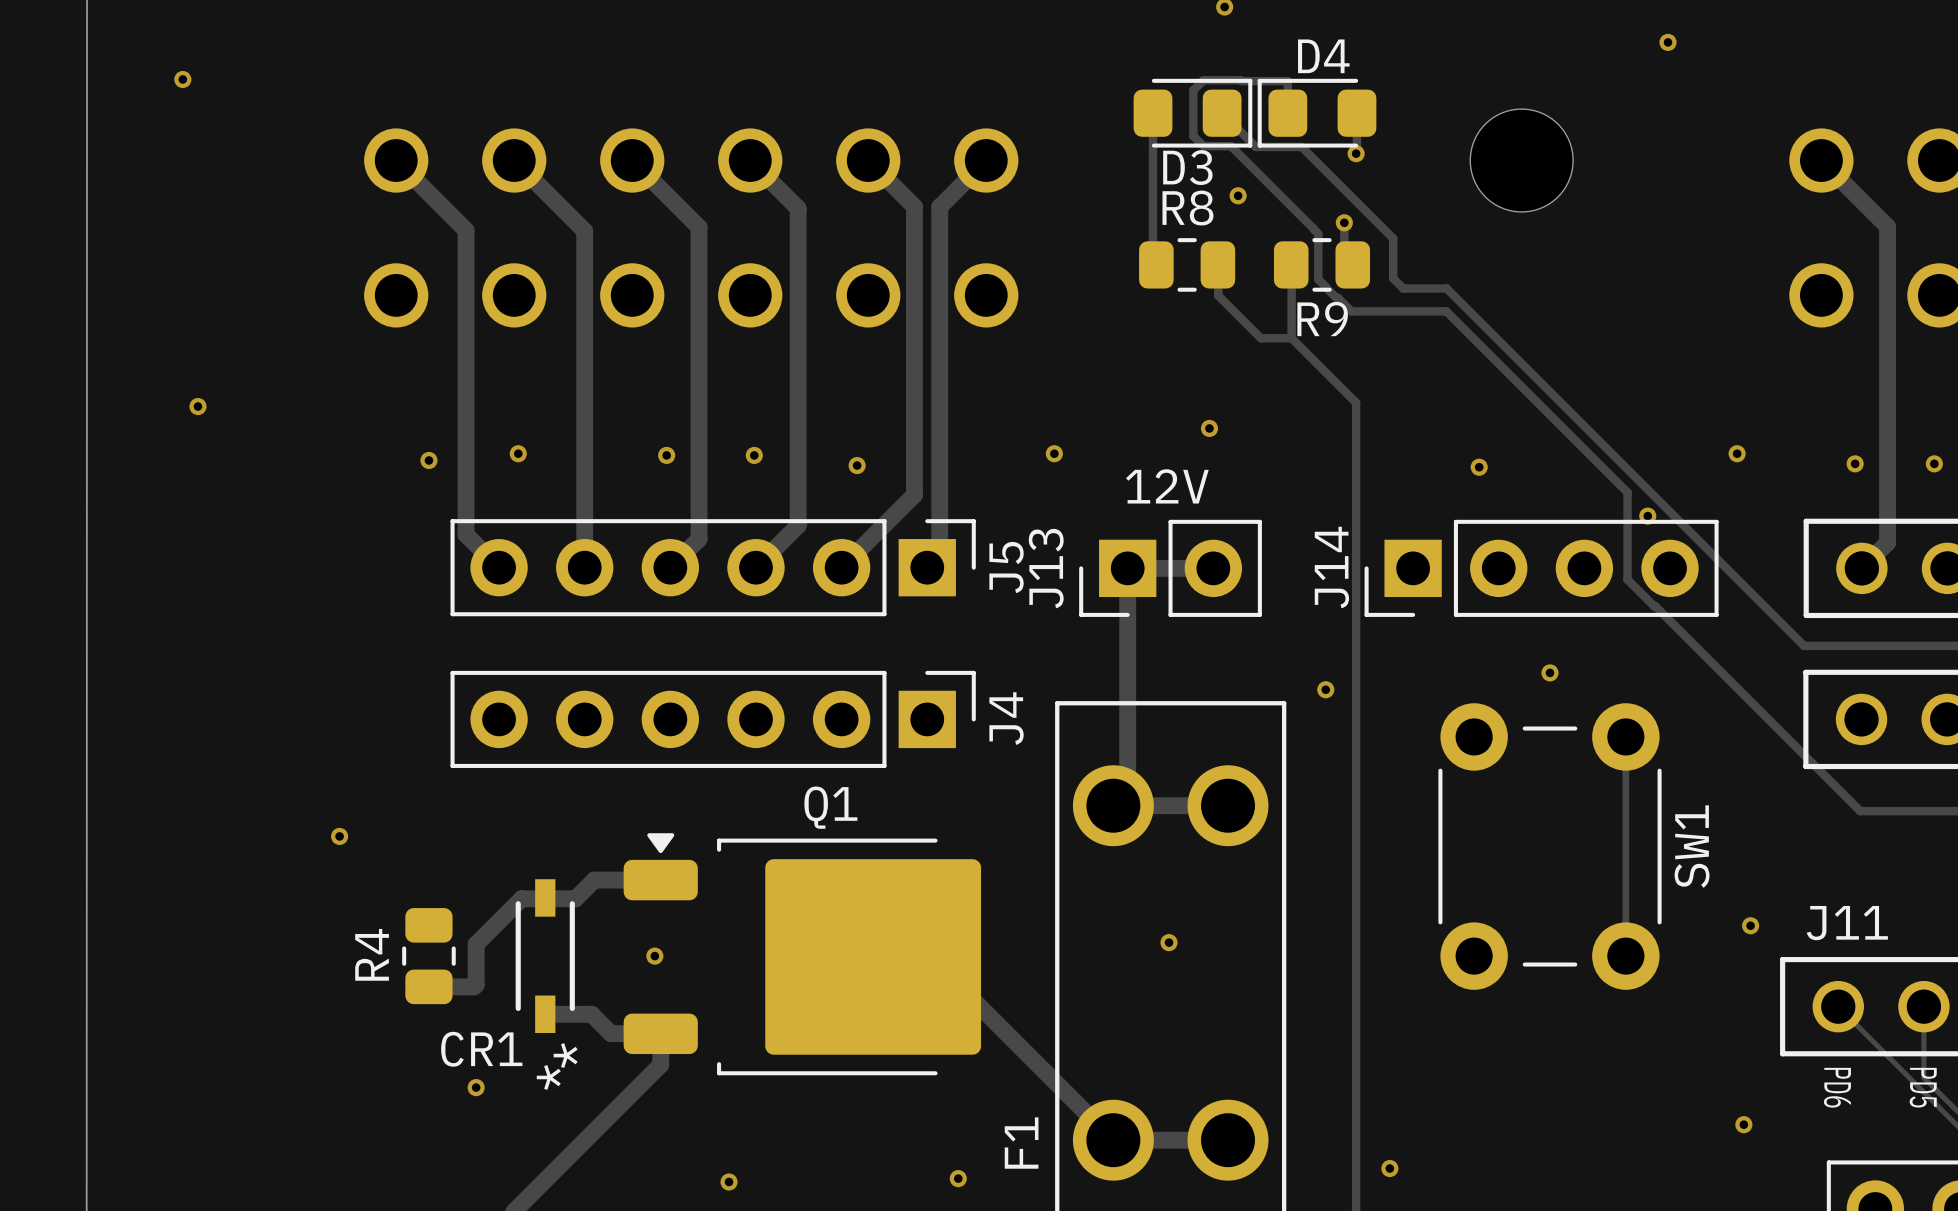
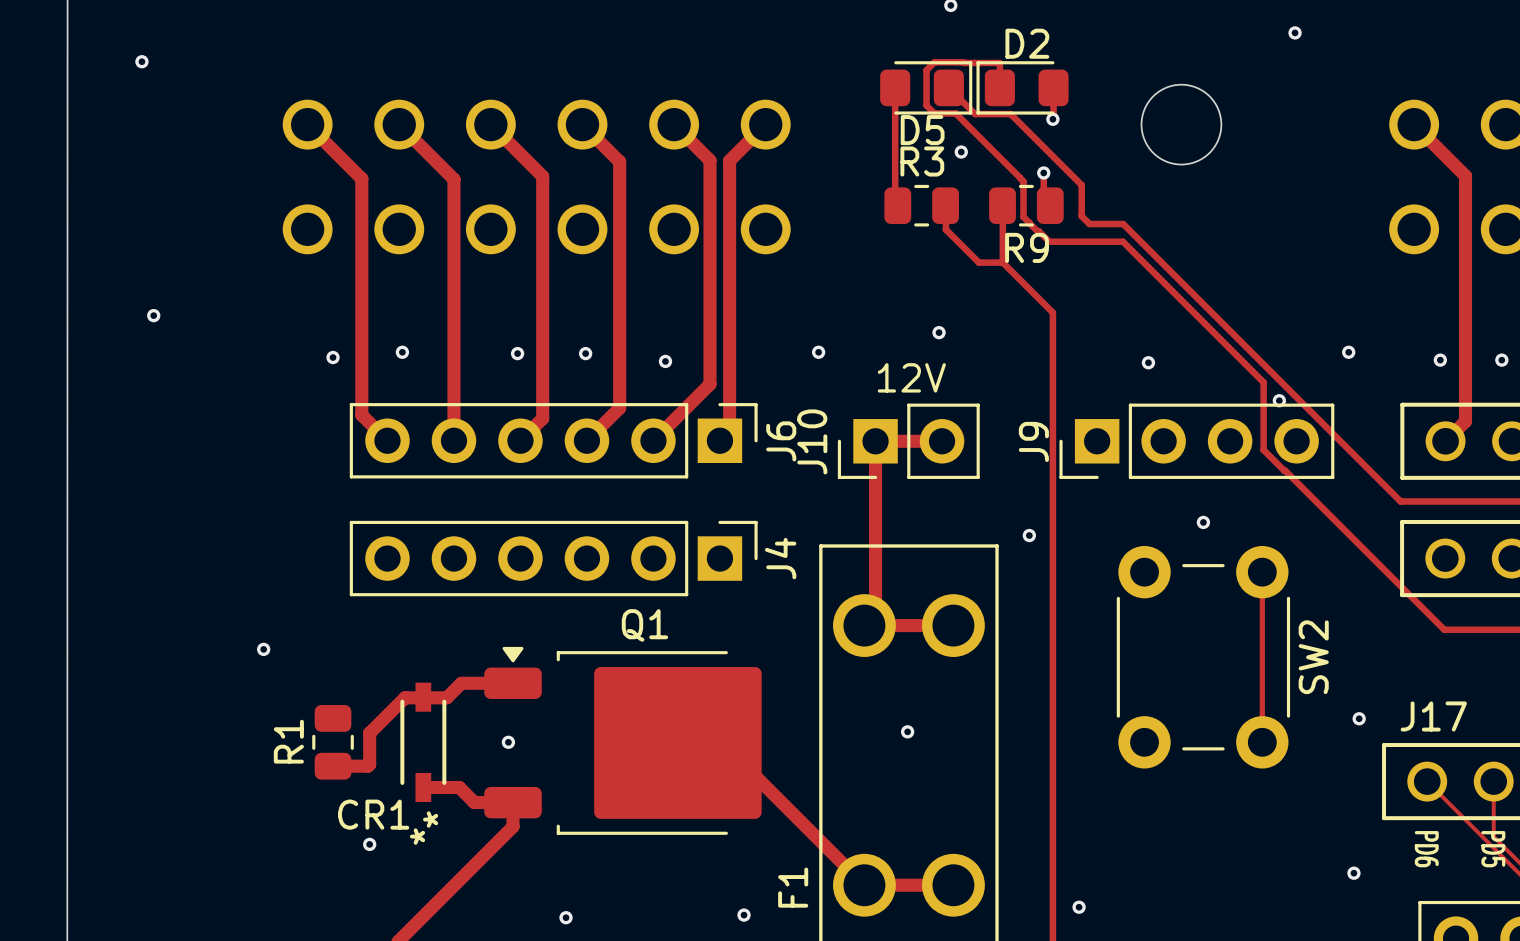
D4 name: D4 (1323, 56) -> D2 (1027, 43)
D3 name: D3 (1187, 167) -> D5 (922, 130)
R8 name: R8 (1187, 208) -> R3 (922, 161)
J5 name: J5 (1006, 567) -> J6 (781, 441)
J14 name: J14 (1331, 567) -> J9 (1033, 441)
J13 name: J13 (1046, 568) -> J10 (812, 441)
SW1 name: SW1 (1692, 846) -> SW2 (1313, 657)
J11 name: J11 (1847, 923) -> J17 (1433, 716)
R4 name: R4 (372, 954) -> R1 (288, 741)

